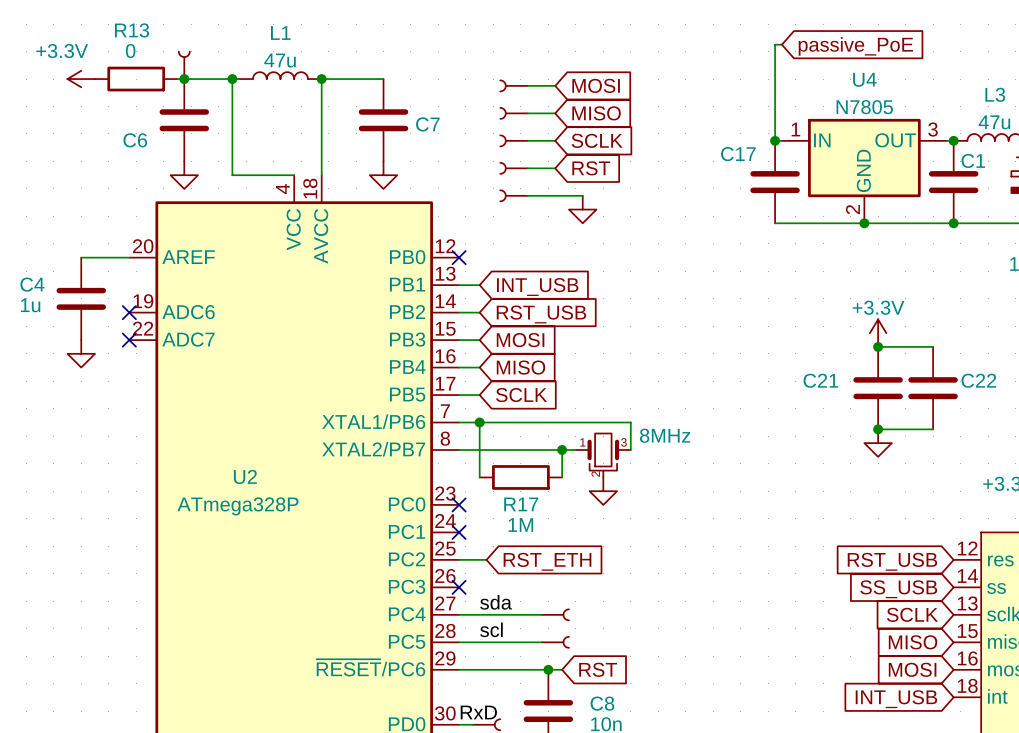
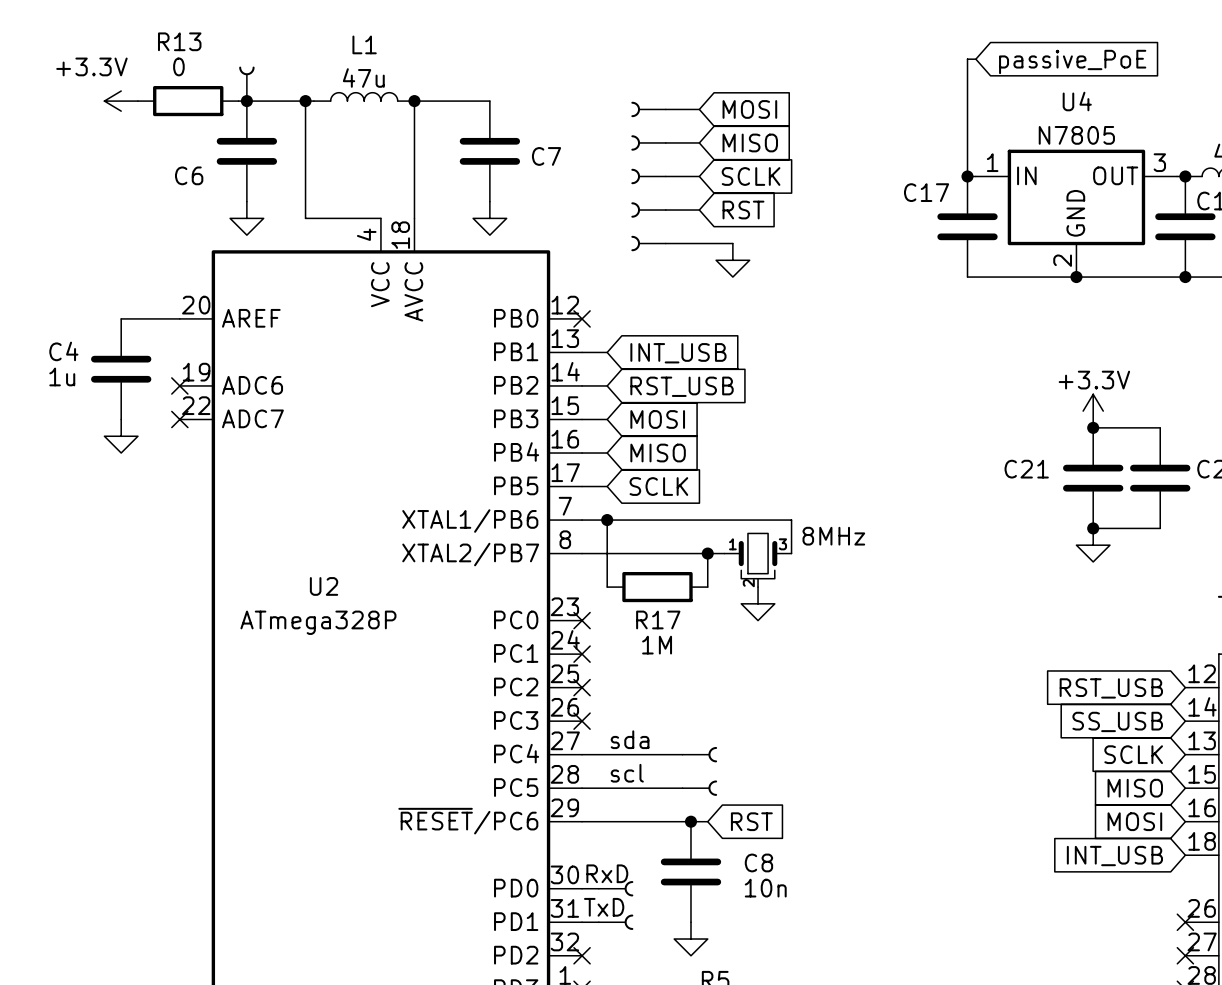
wire: (459, 559) (486, 559) -> none
no-connect mark: none -> (582, 687)
global label: RST_ETH (547, 561) -> none

